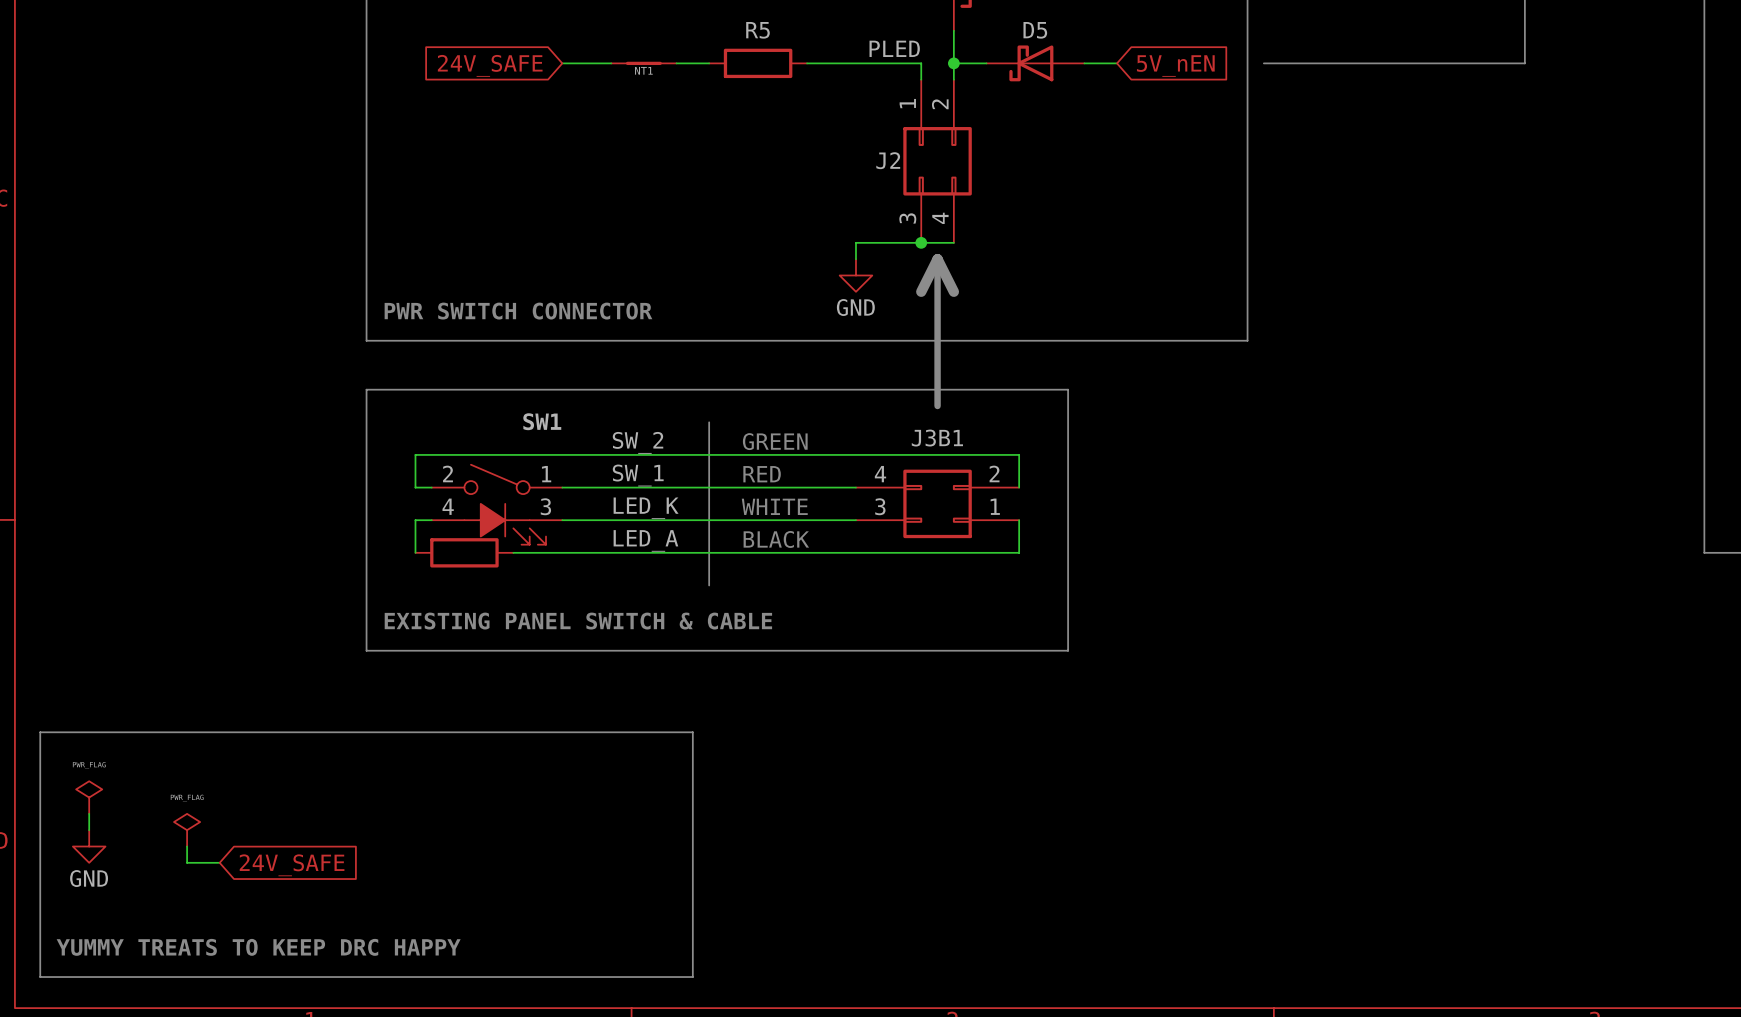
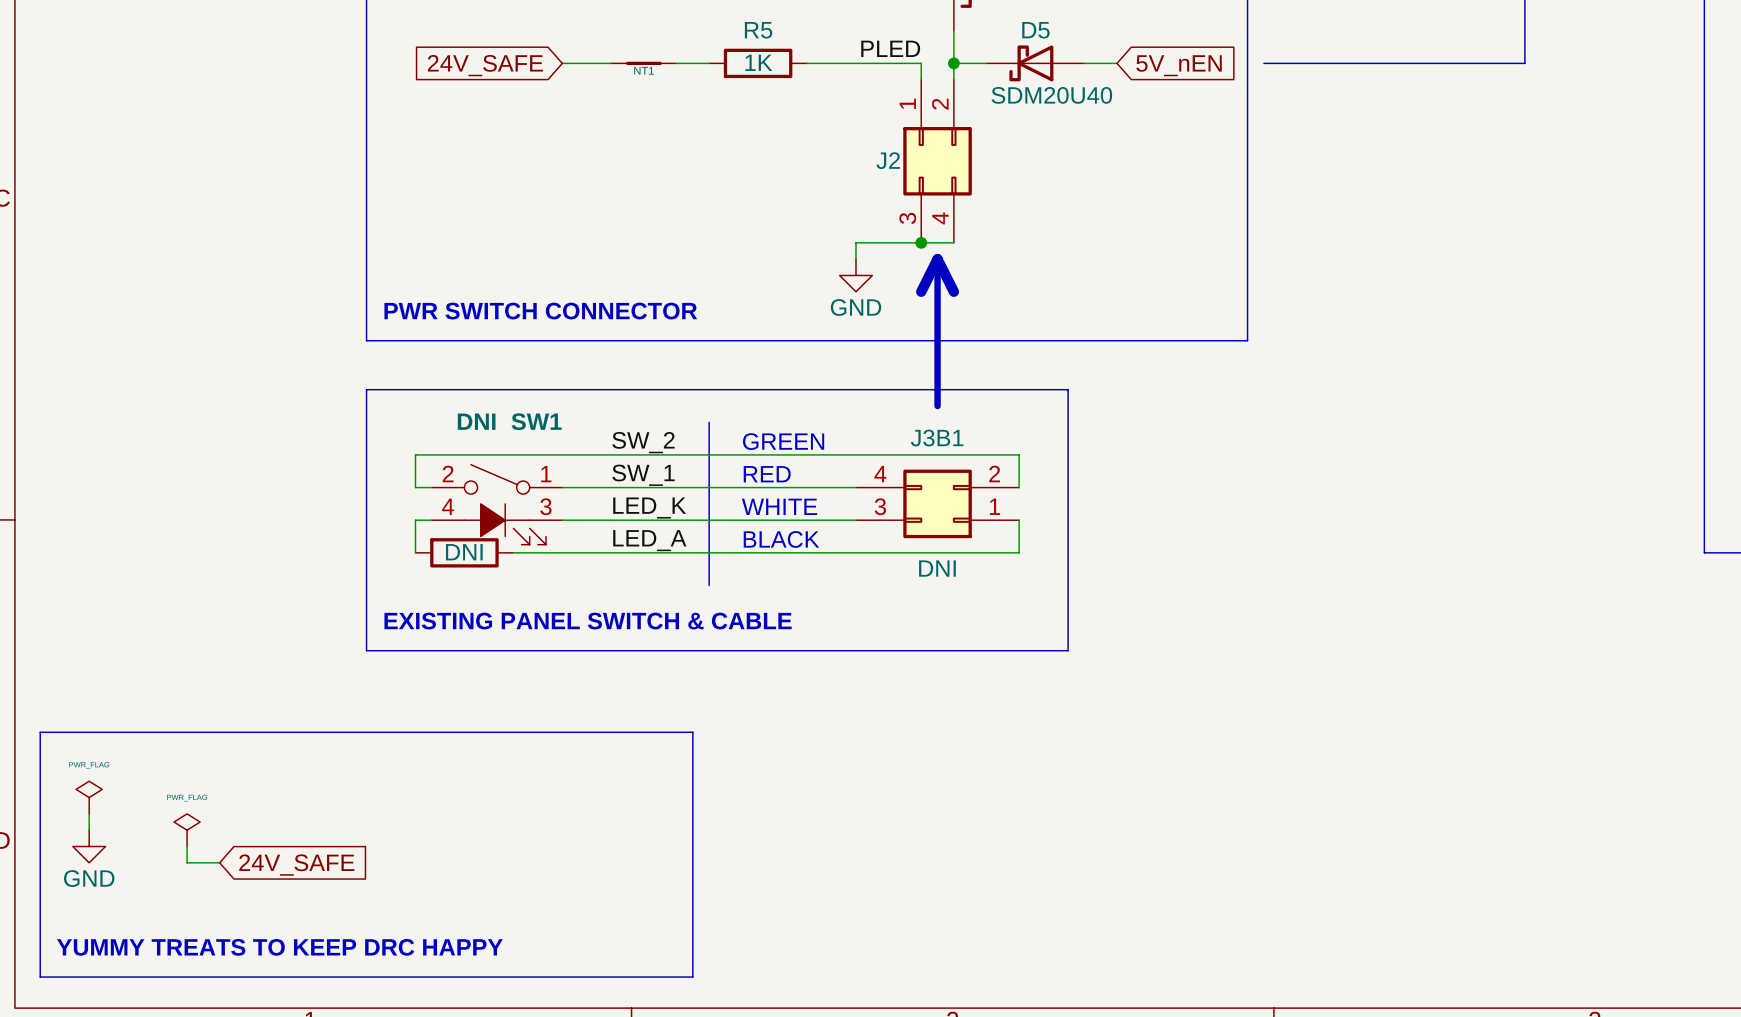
R5 value: none -> 1K (758, 62)
D5 value: none -> SDM20U40 (1051, 95)
SW1 value: none -> DNI (476, 421)
part value: none -> DNI (464, 552)
J3B1 value: none -> DNI (937, 568)

